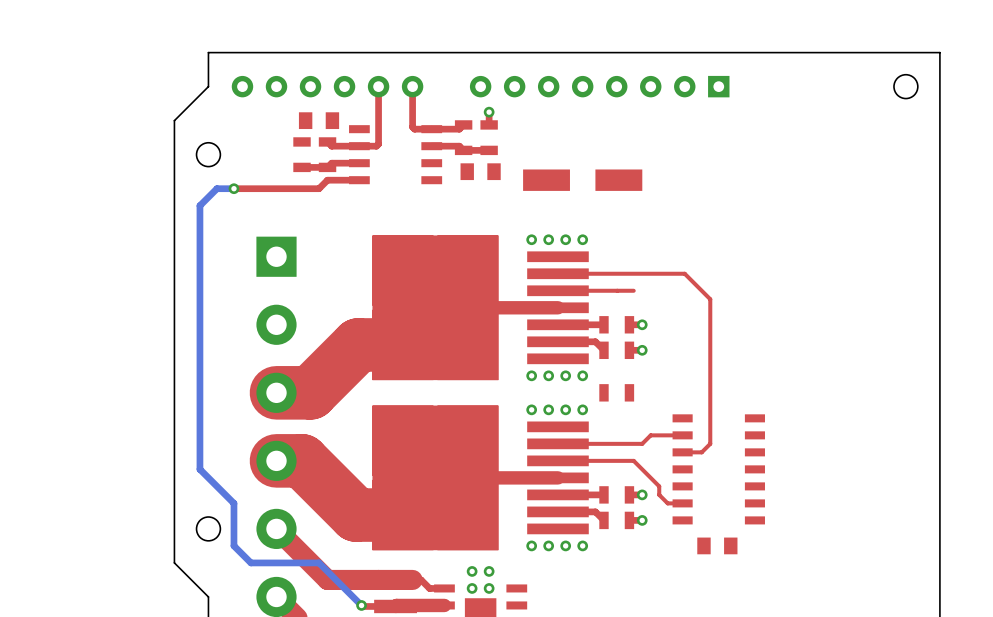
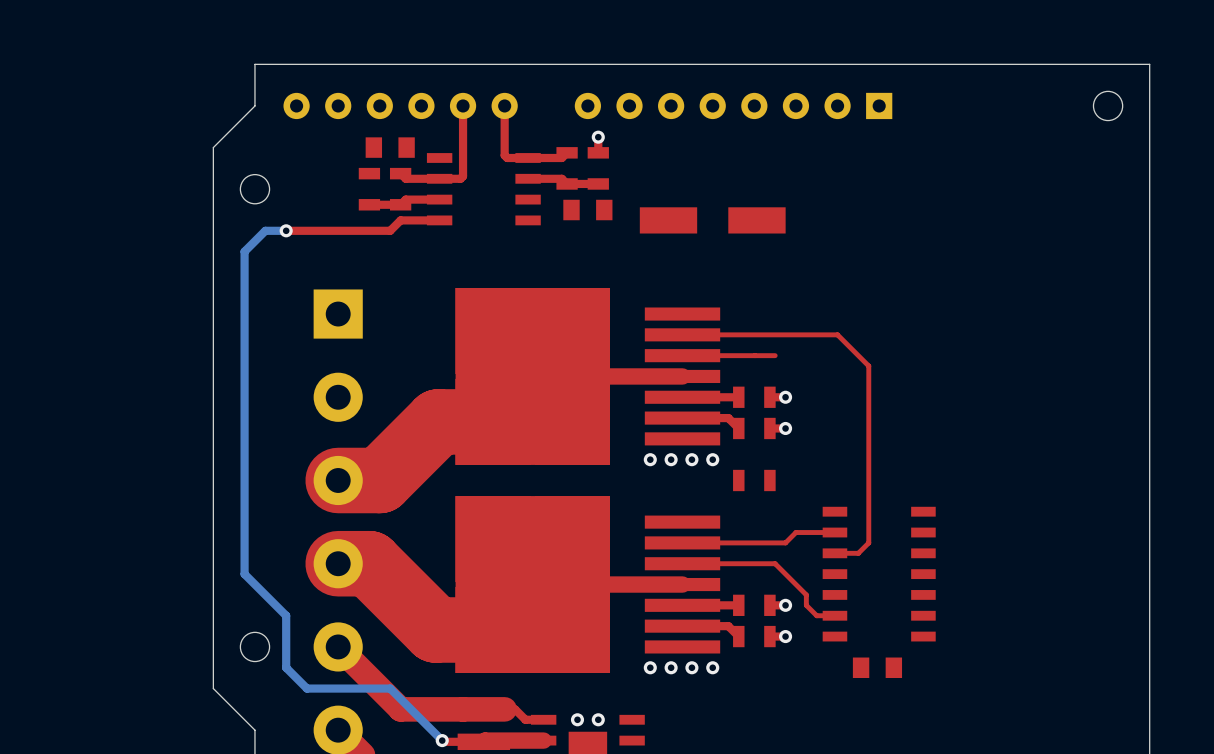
via: (531, 239) -> none
via: (548, 239) -> none
via: (565, 239) -> none
via: (582, 239) -> none
via: (531, 409) -> none
via: (548, 409) -> none
via: (565, 409) -> none
via: (582, 409) -> none
via: (472, 571) -> none
via: (489, 571) -> none

